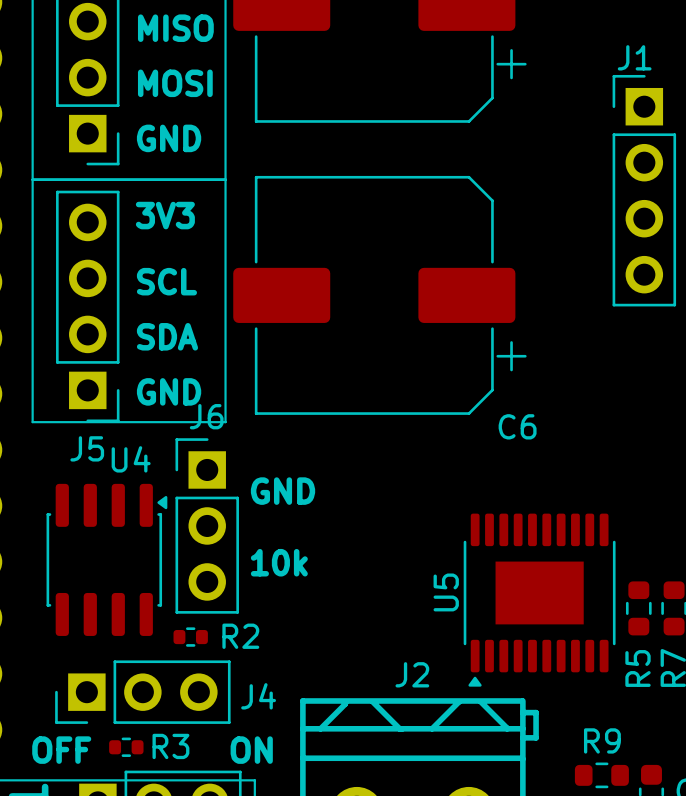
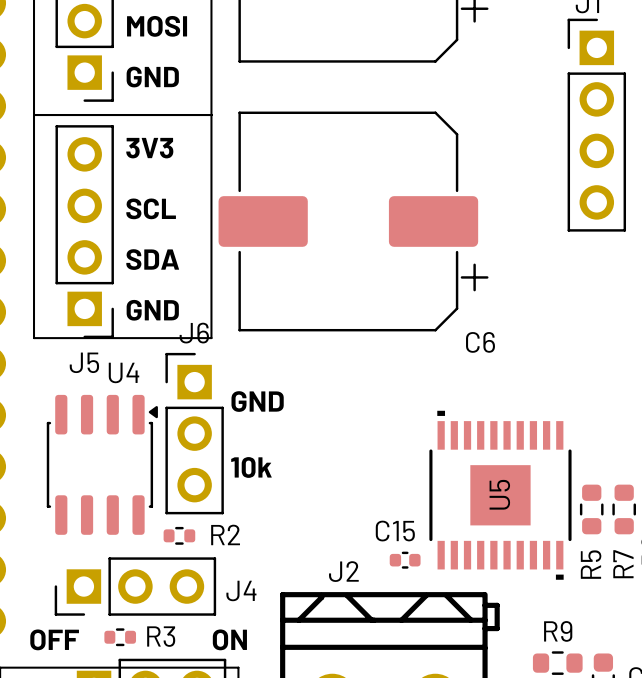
U5 footprint: [463, 513, 616, 687] -> [429, 410, 572, 580]
U5 name position: U5 (446, 592) -> U5 (499, 494)
C15: none -> (405, 560)
J2 name position: J2 (412, 674) -> J2 (343, 571)

